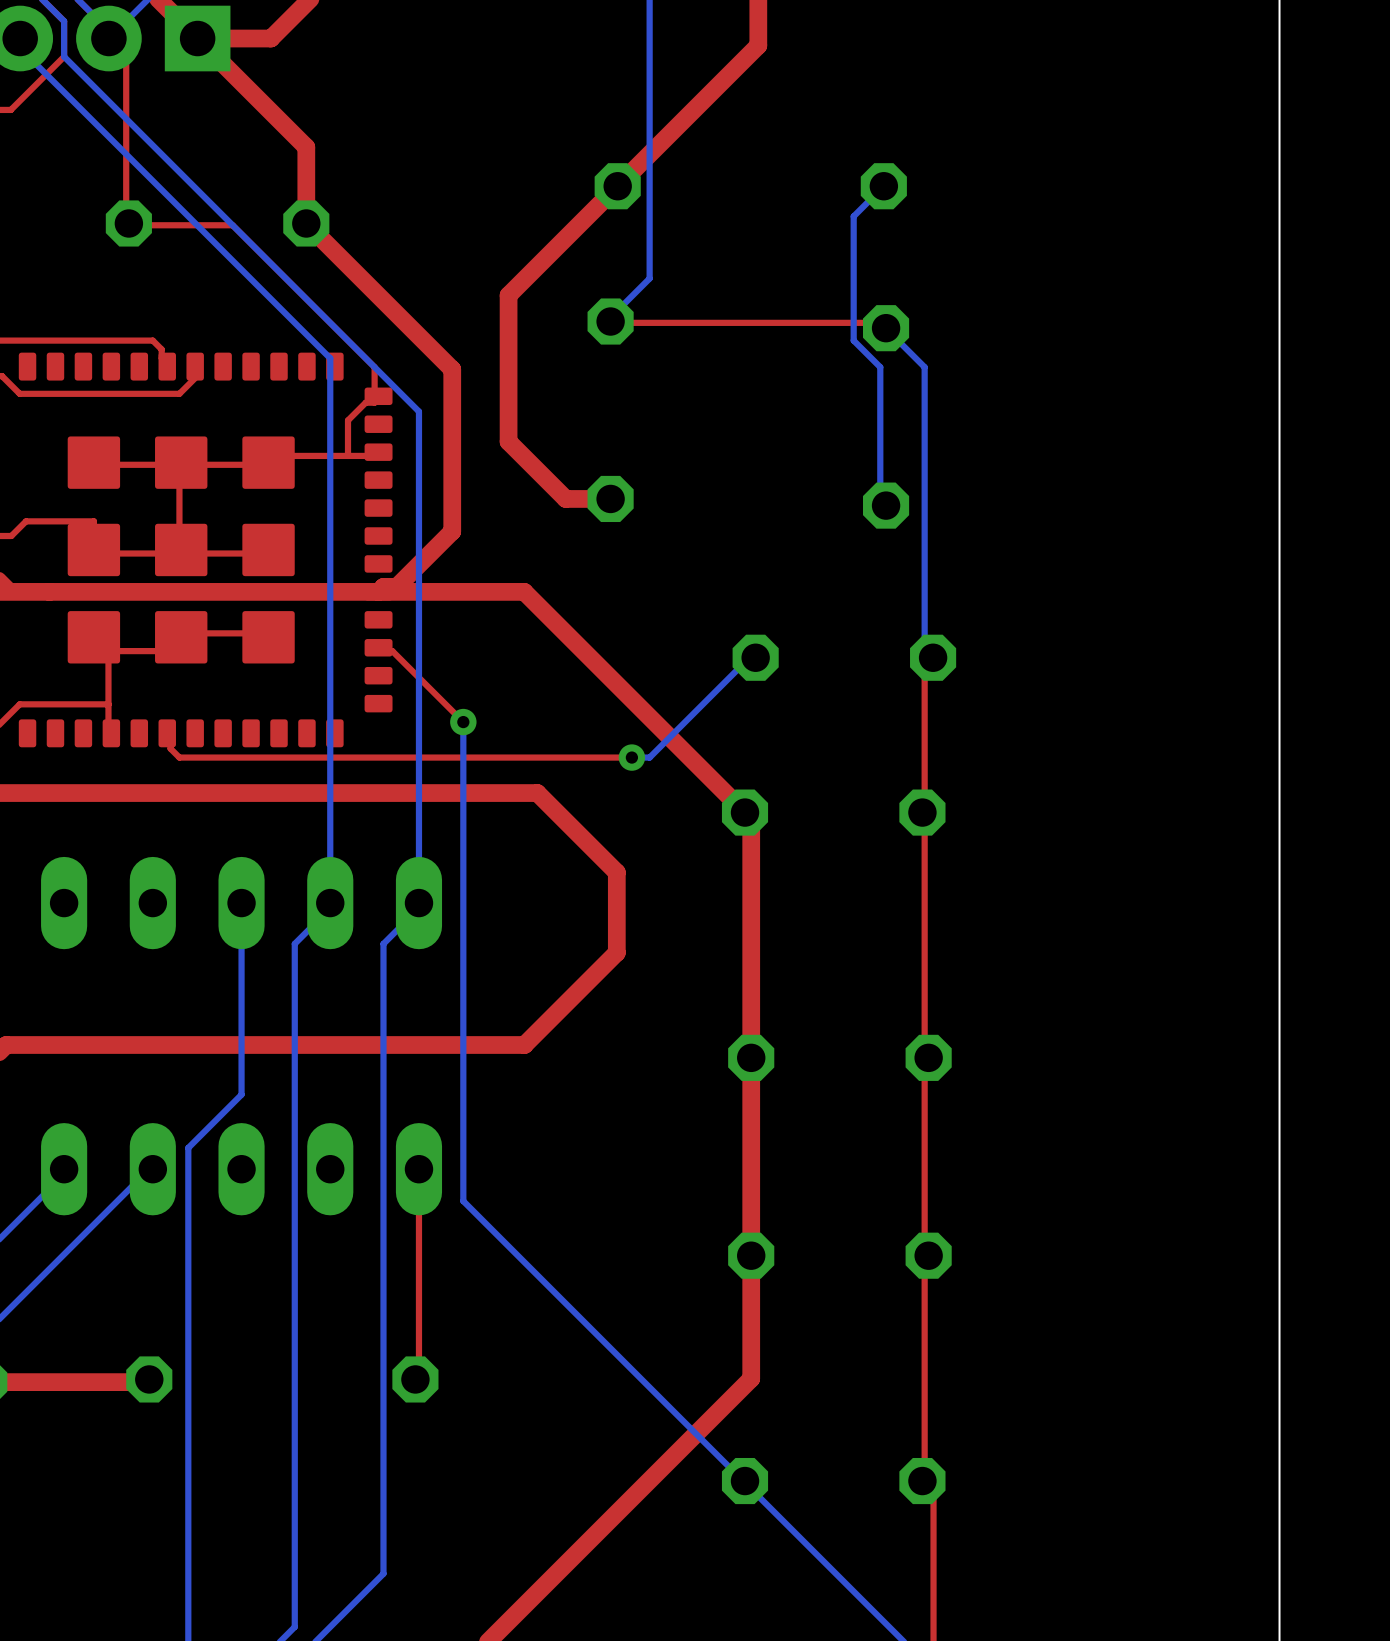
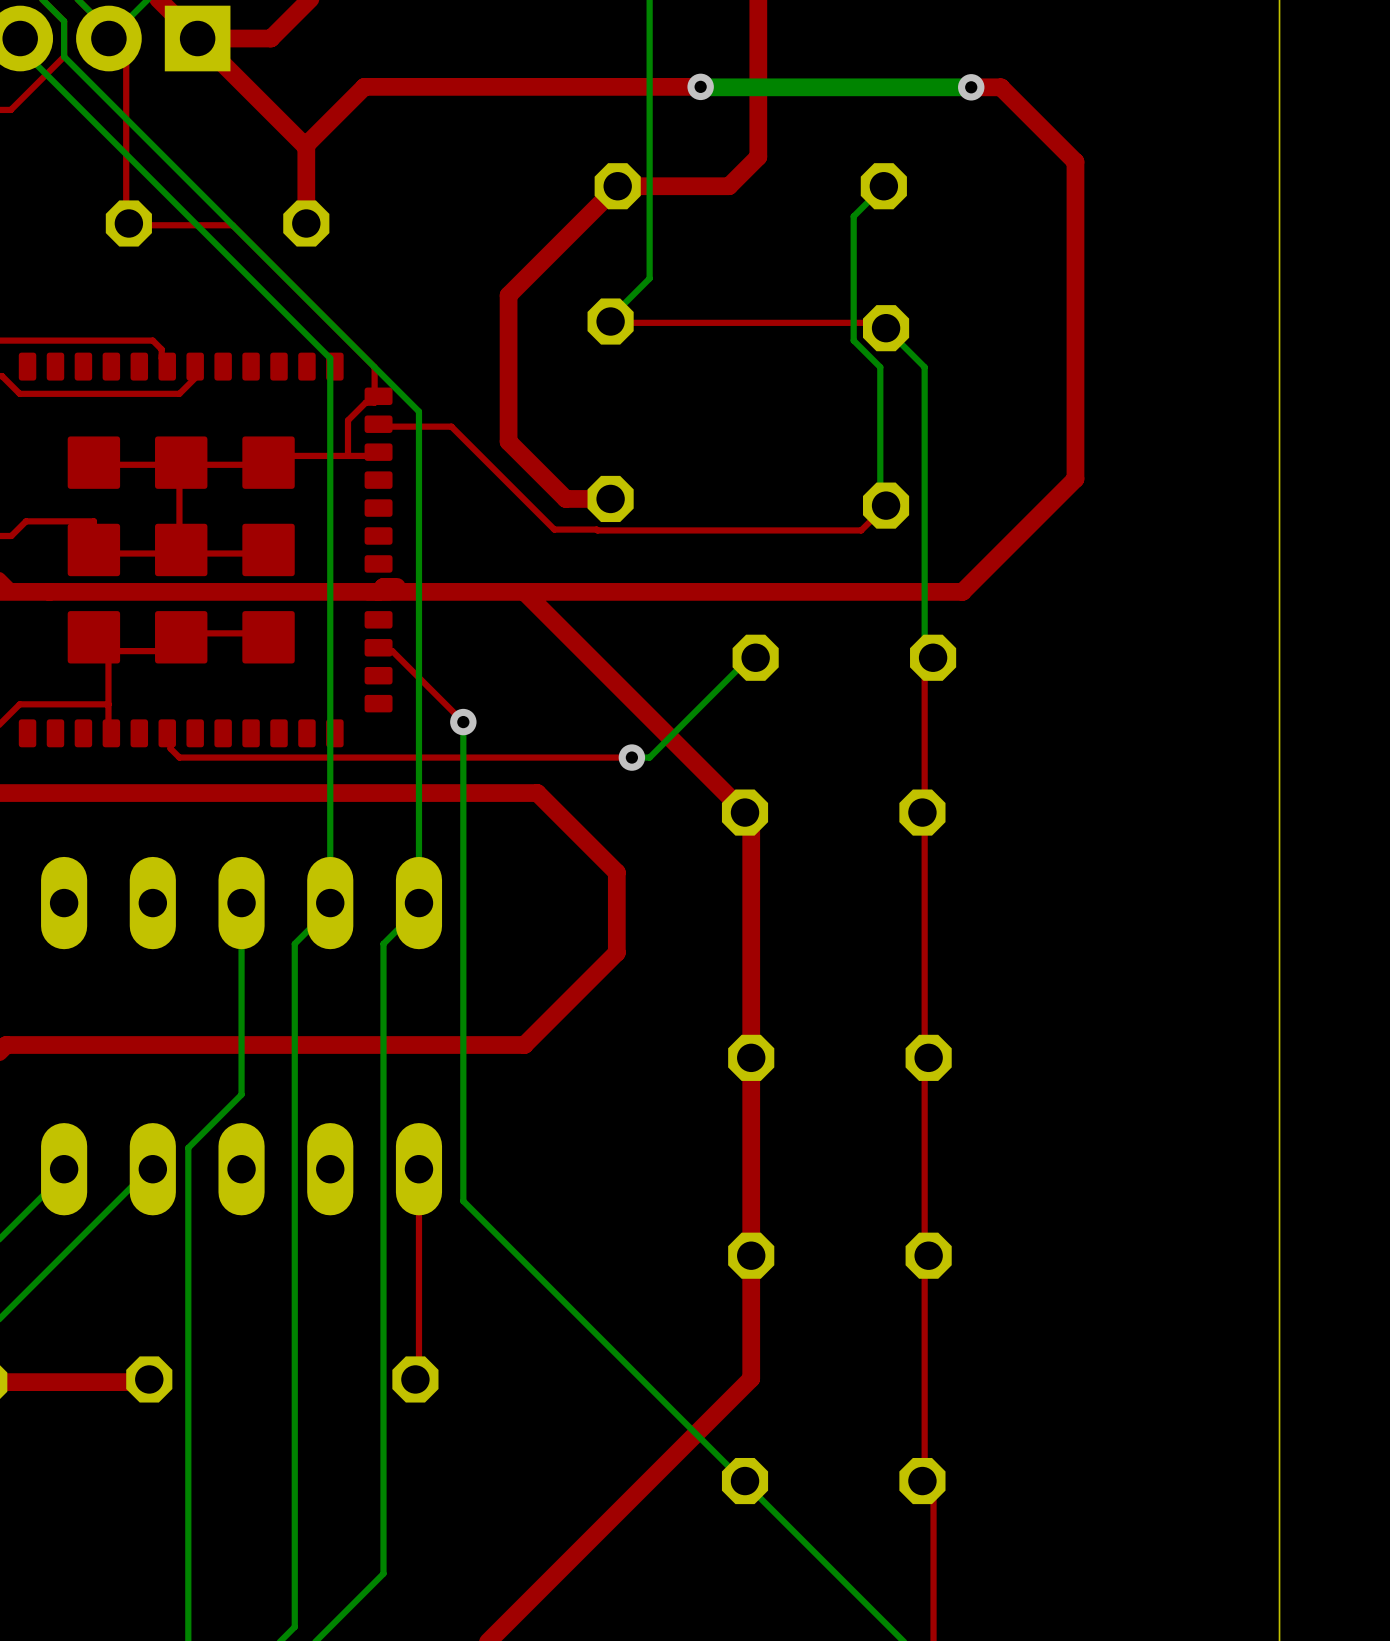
top track: (758, 45) (617, 186) -> (758, 45) (758, 156) (729, 186) (617, 186)
top track: none -> (700, 86) (364, 86) (305, 146)
via: none -> (700, 86)
top track: none -> (971, 87) (1000, 87) (1075, 161) (1075, 478) (962, 591) (524, 591)
bottom track: none -> (971, 87) (701, 87)
via: none -> (971, 87)
top track: (306, 223) (452, 369) (452, 531) (396, 586) -> none
top track: none -> (378, 424) (380, 426) (451, 426) (554, 529) (861, 530) (886, 505)

